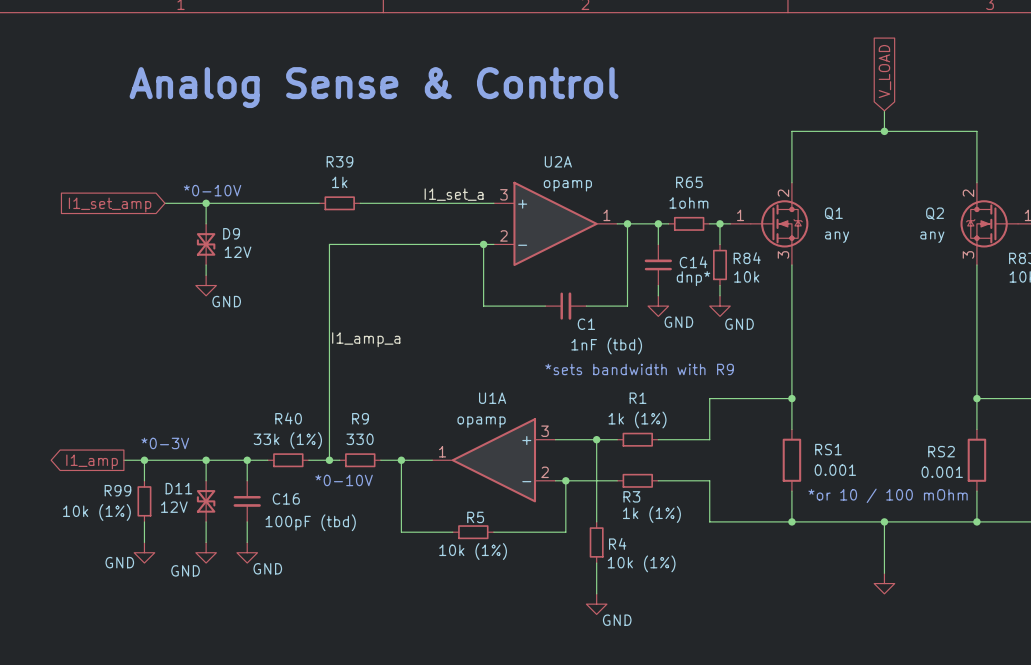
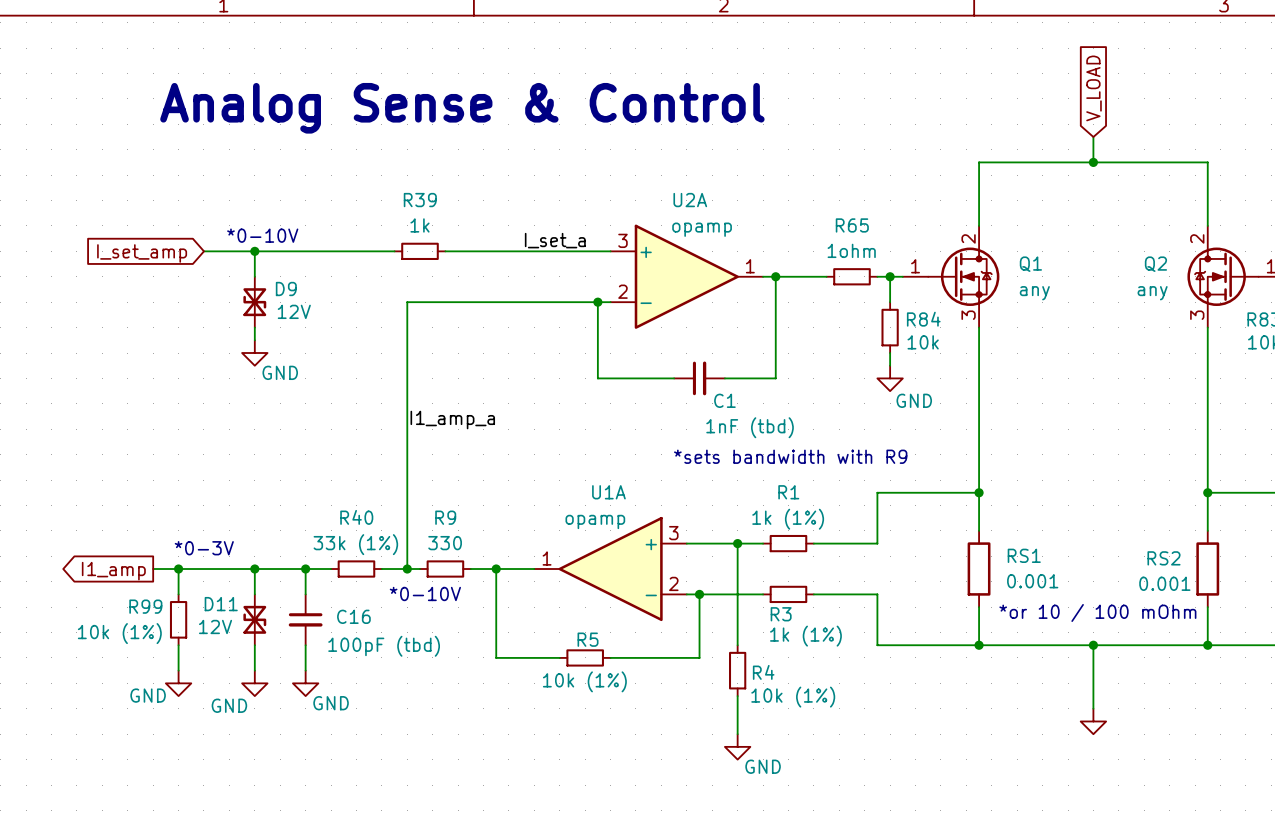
label: I1_set_a (454, 194) -> I_set_a (555, 240)
global label: I1_set_amp (110, 205) -> I_set_amp (142, 253)
wire: (658, 223) (658, 244) -> none
junction: (658, 223) -> none
C14: dnp* (658, 264) -> none
wire: (658, 285) (658, 295) -> none
power symbol: GND (658, 306) -> none

